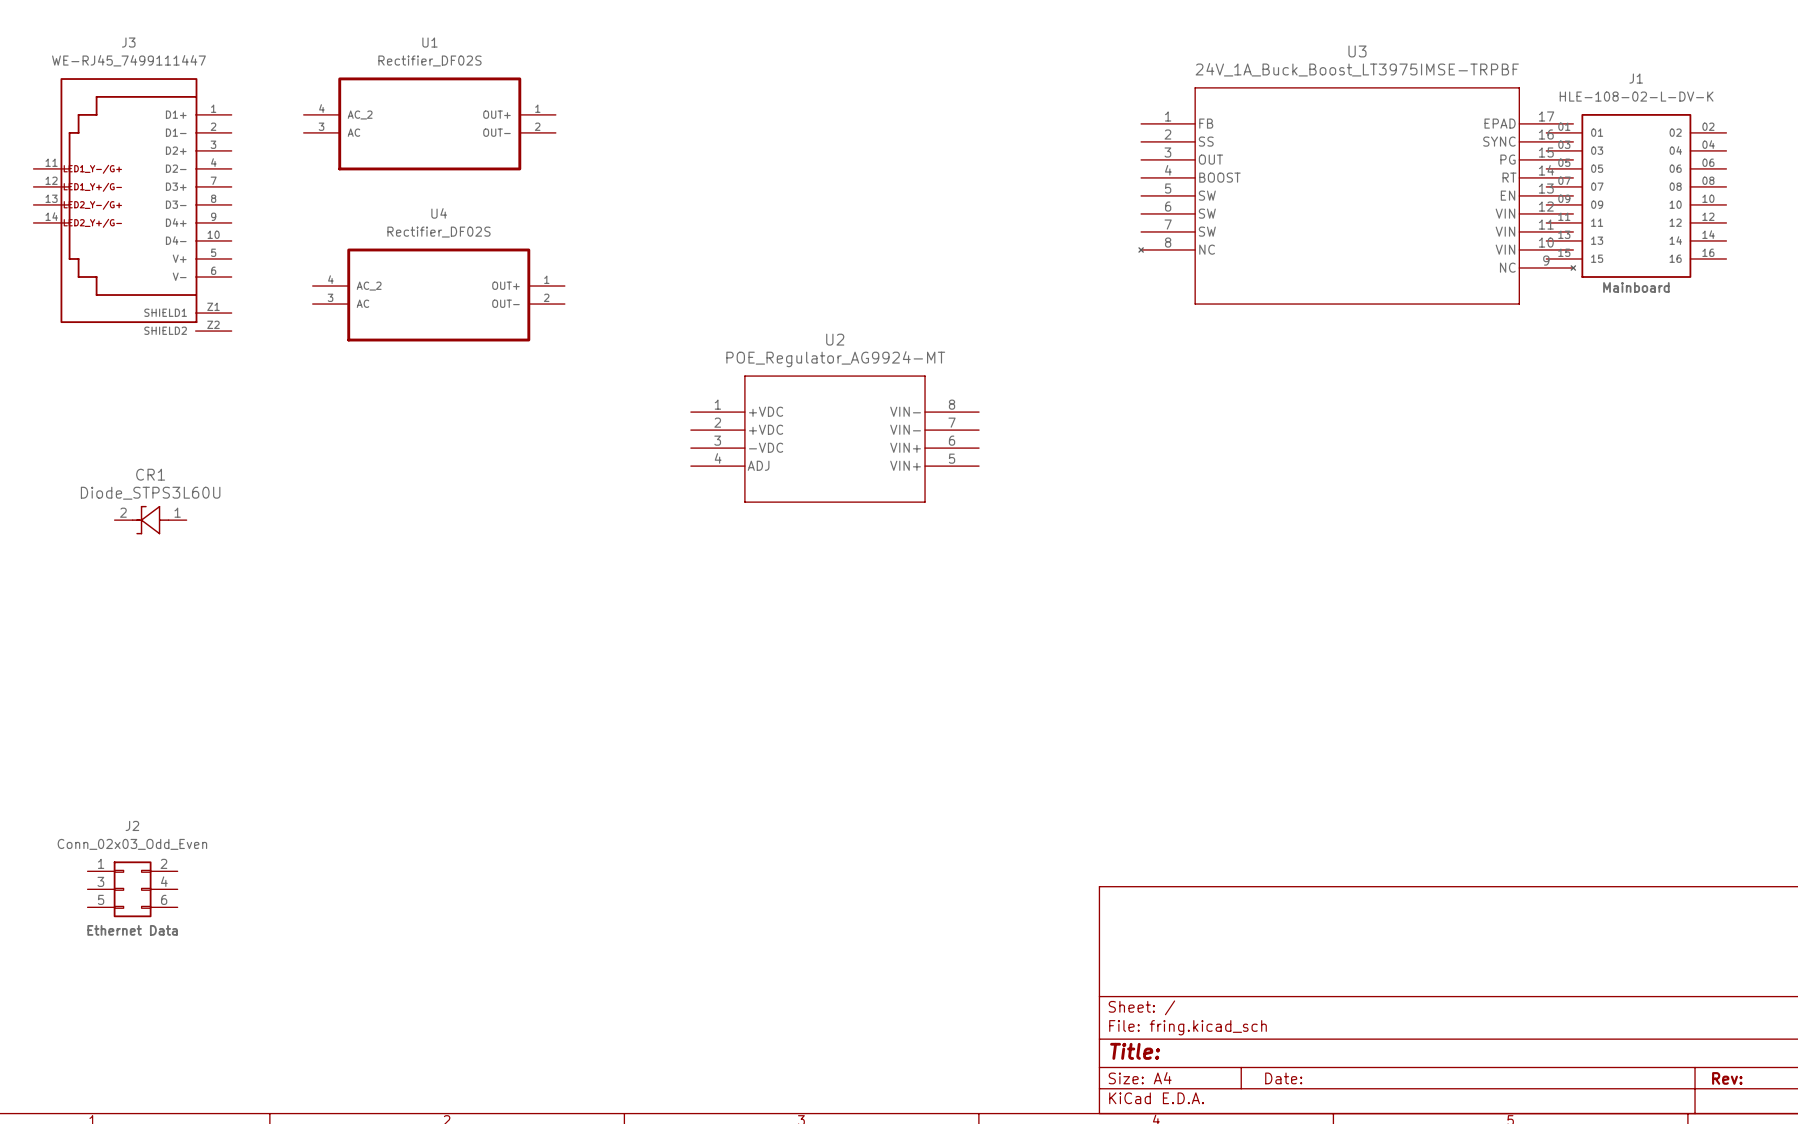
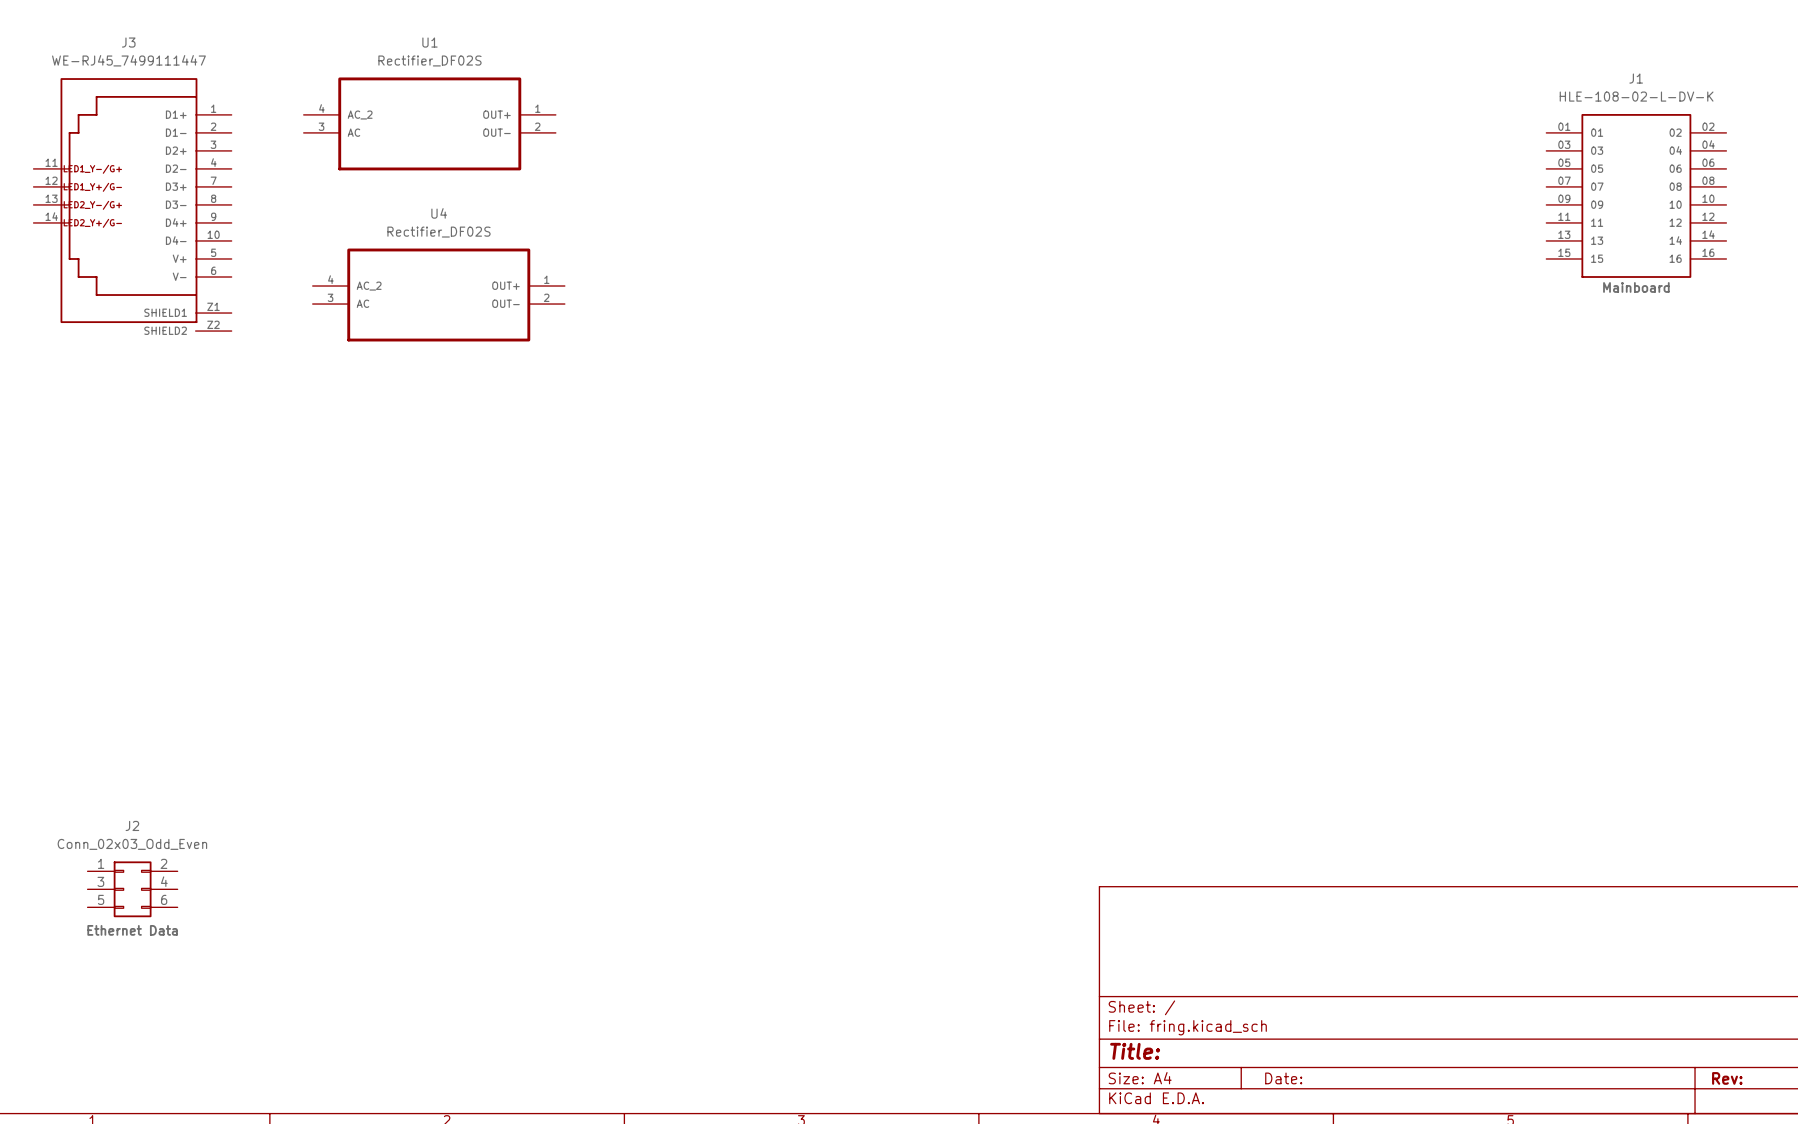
U3: 24V_1A_Buck_Boost_LT3975IMSE-TRPBF (1357, 195) -> none
U2: POE_Regulator_AG9924-MT (834, 439) -> none
CR1: Diode_STPS3L60U (150, 520) -> none

